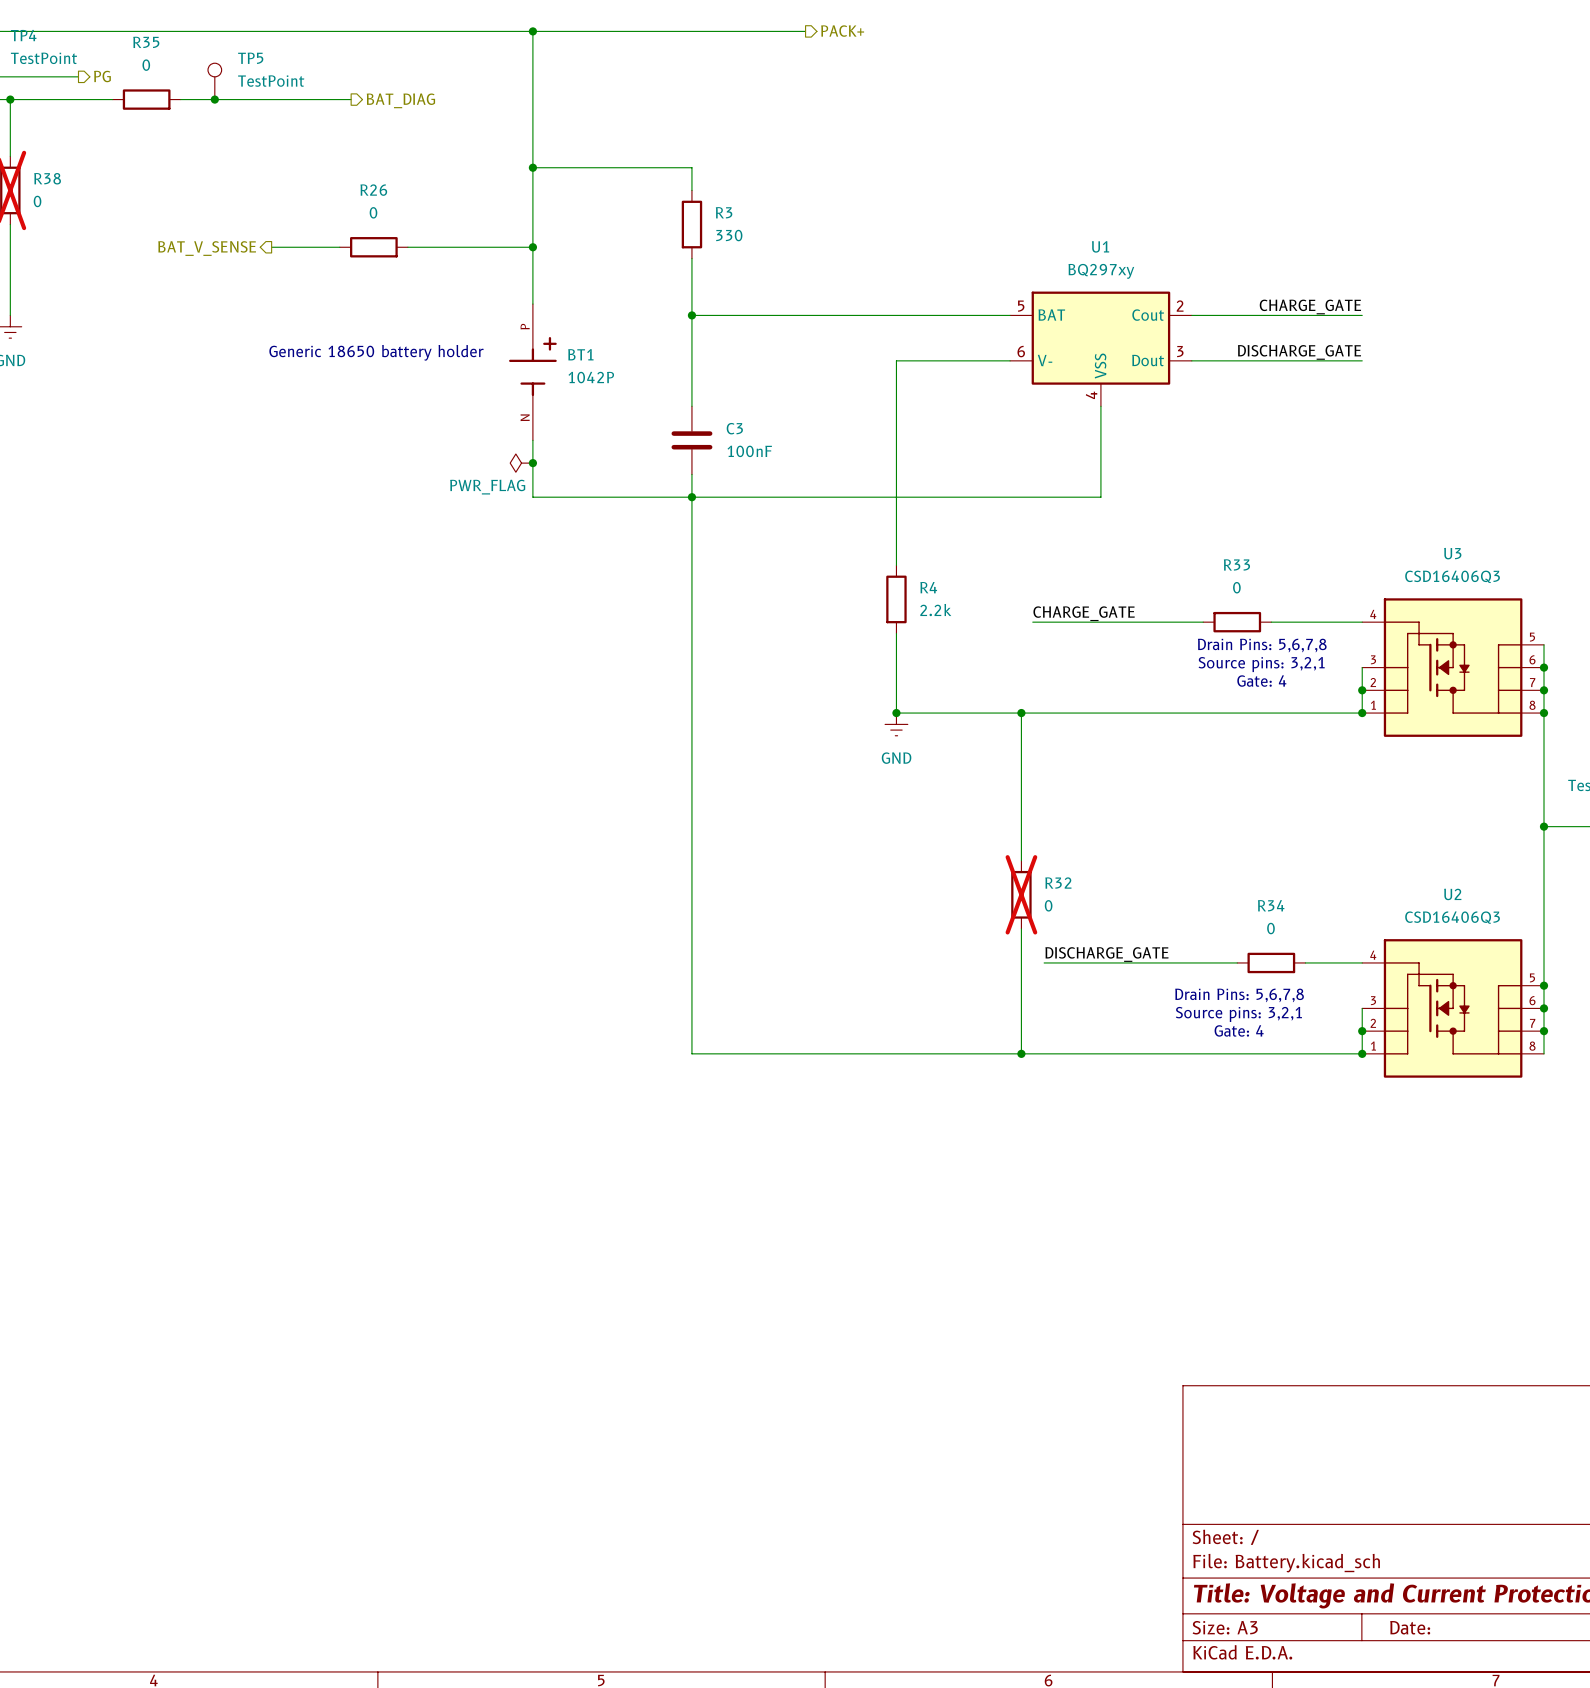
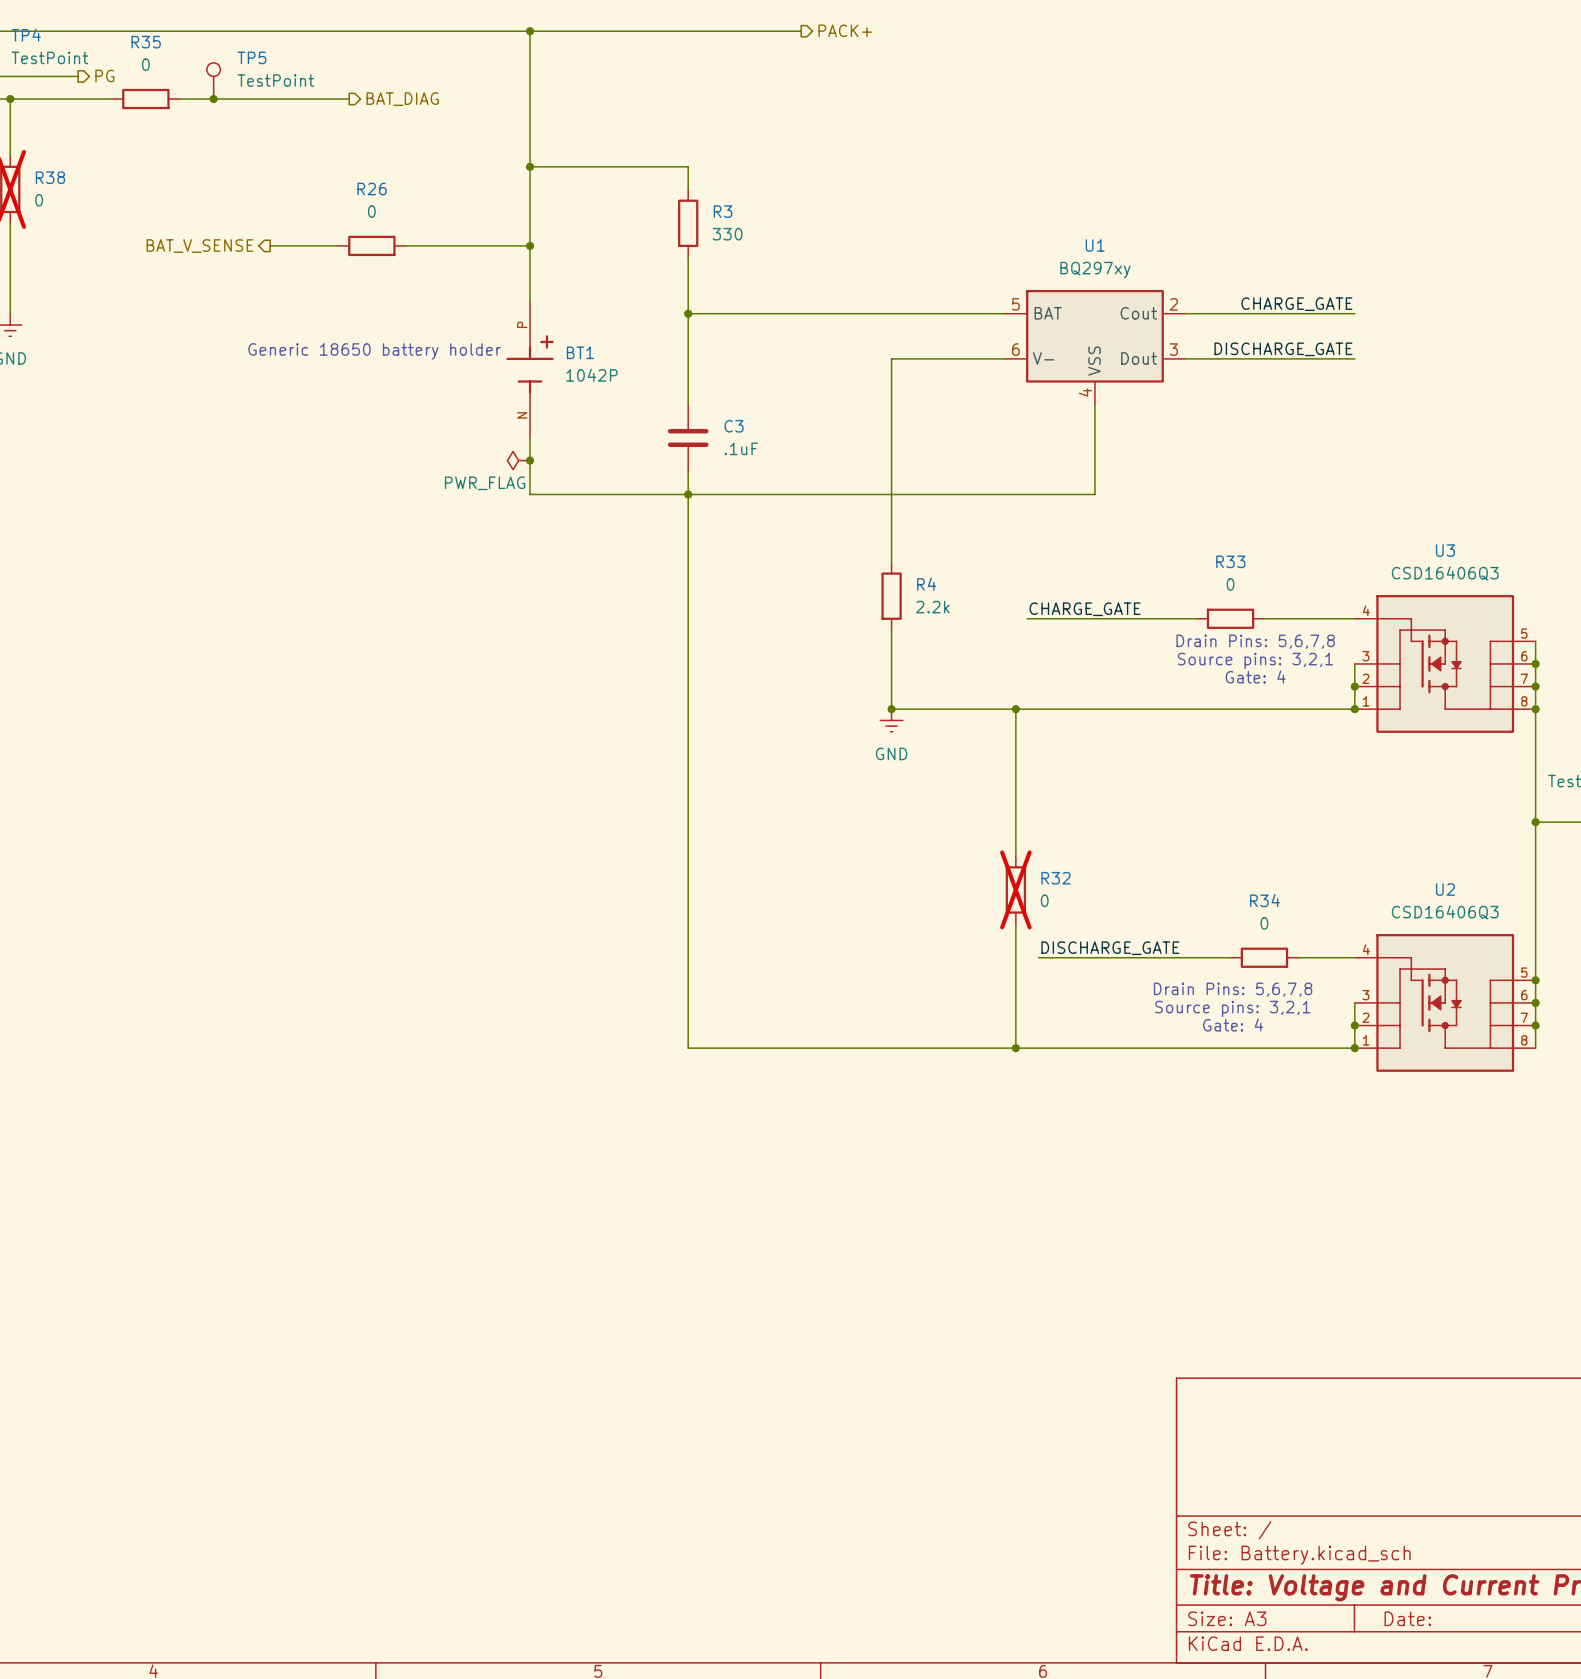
C3 value: 100nF (749, 451) -> .1uF (741, 448)

